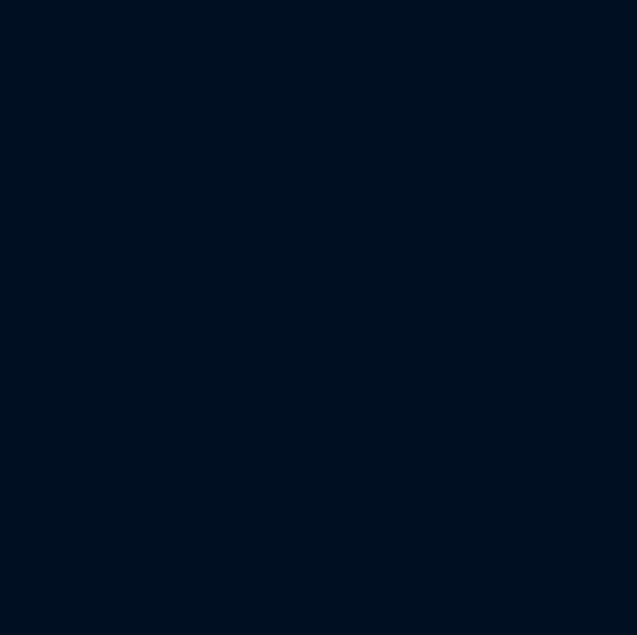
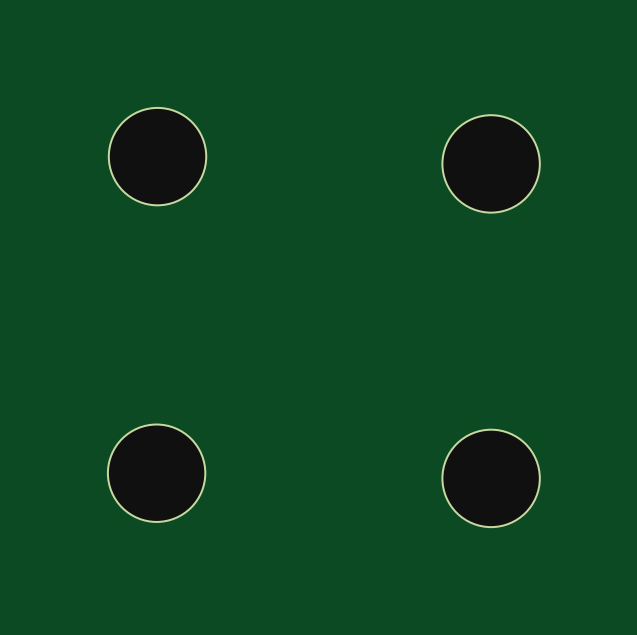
part: none -> (157, 156)
part: none -> (491, 163)
part: none -> (156, 473)
part: none -> (491, 478)

